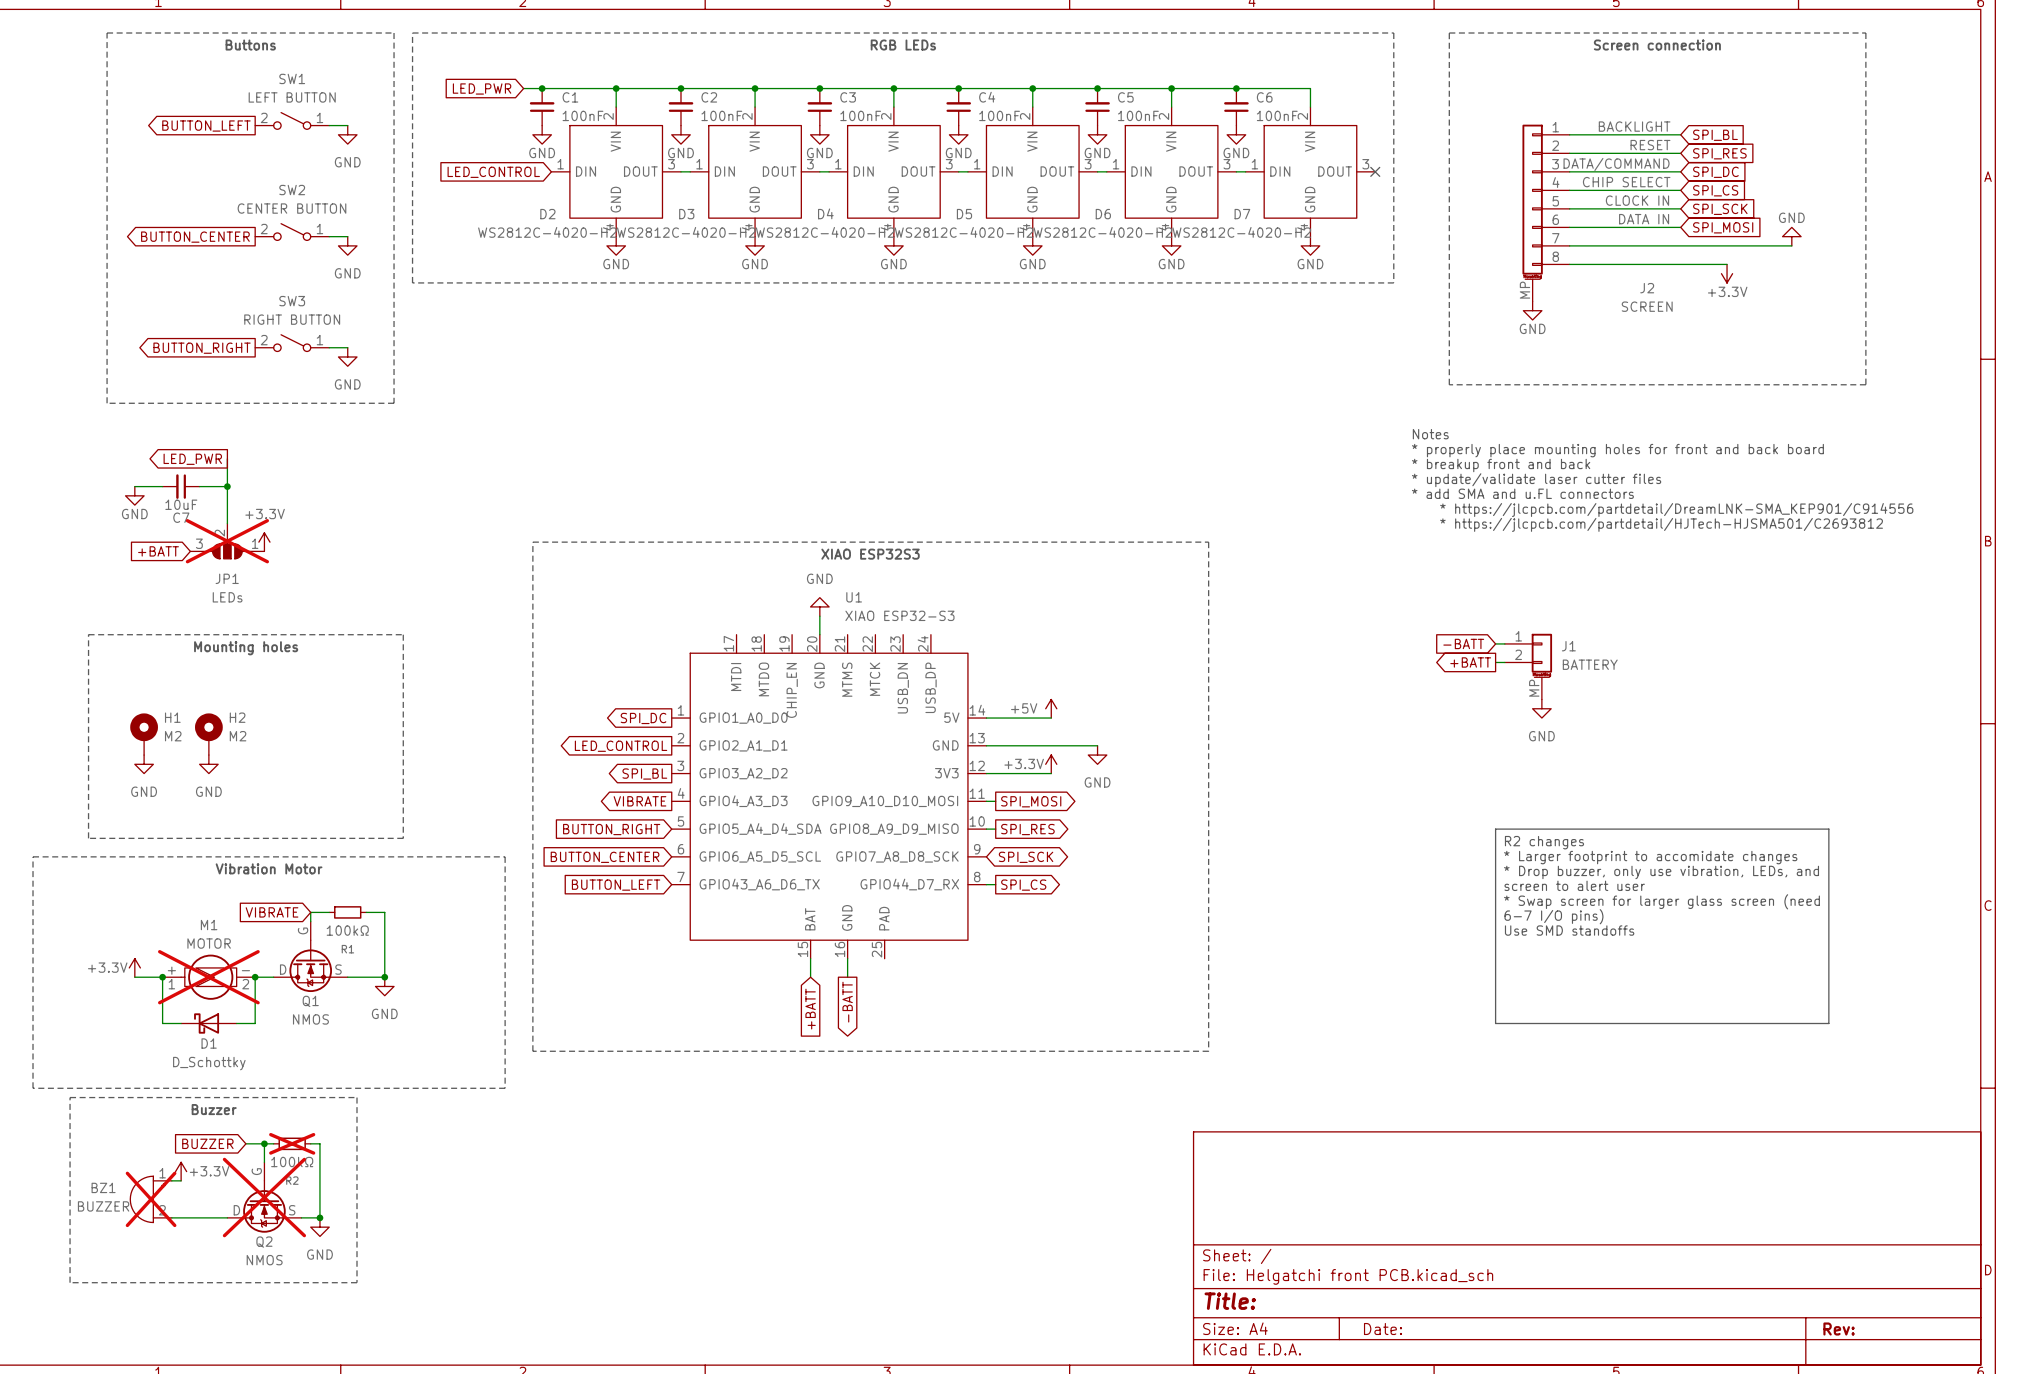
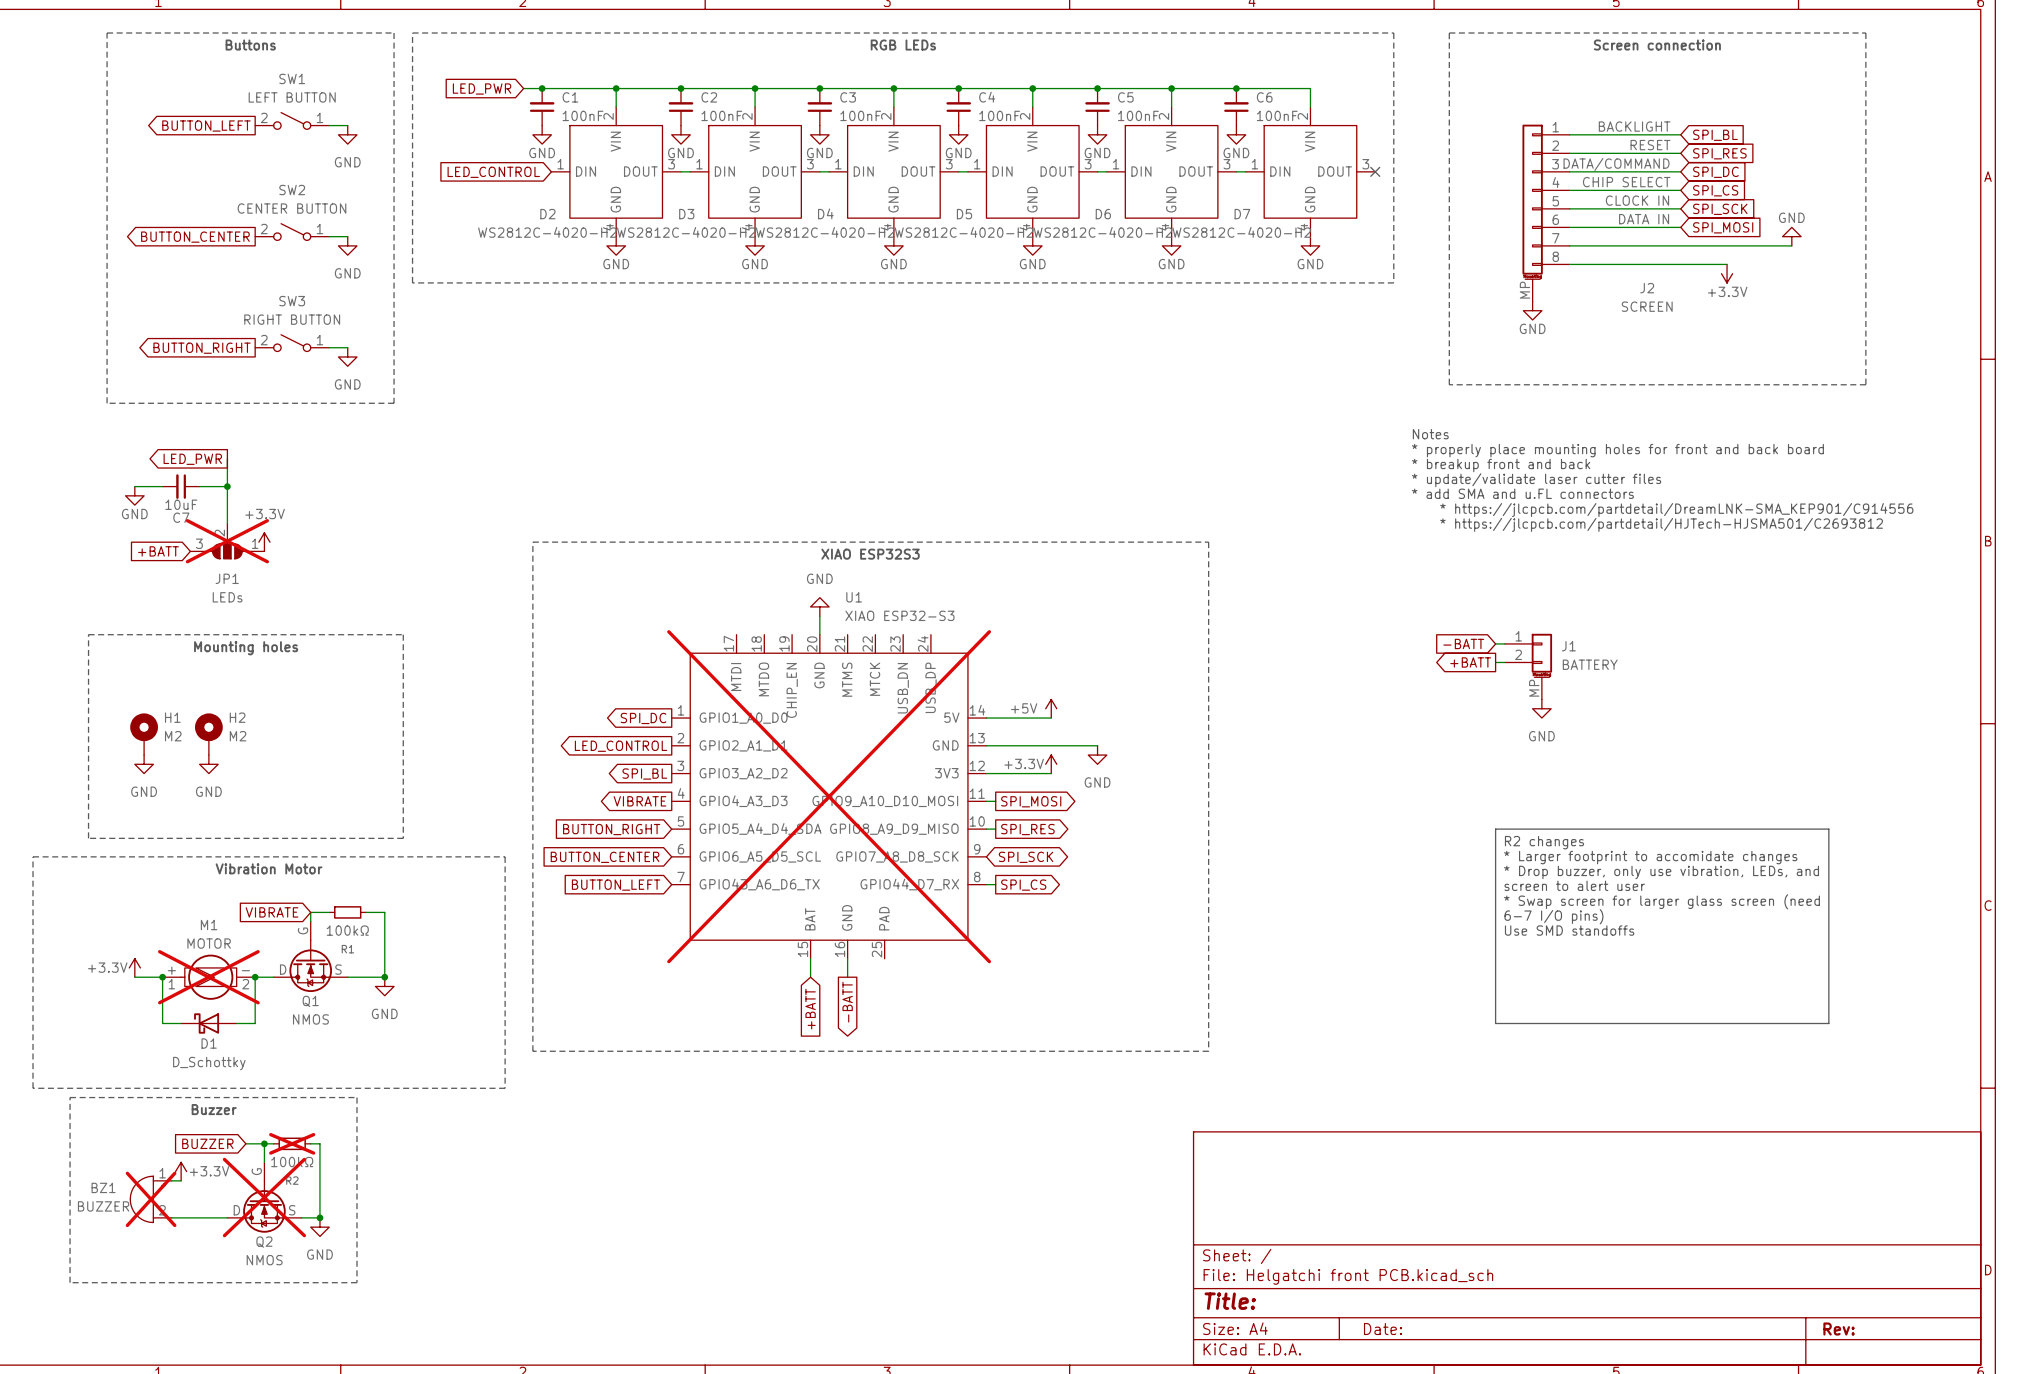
U1 do-not-place cross: none -> (829, 796)

